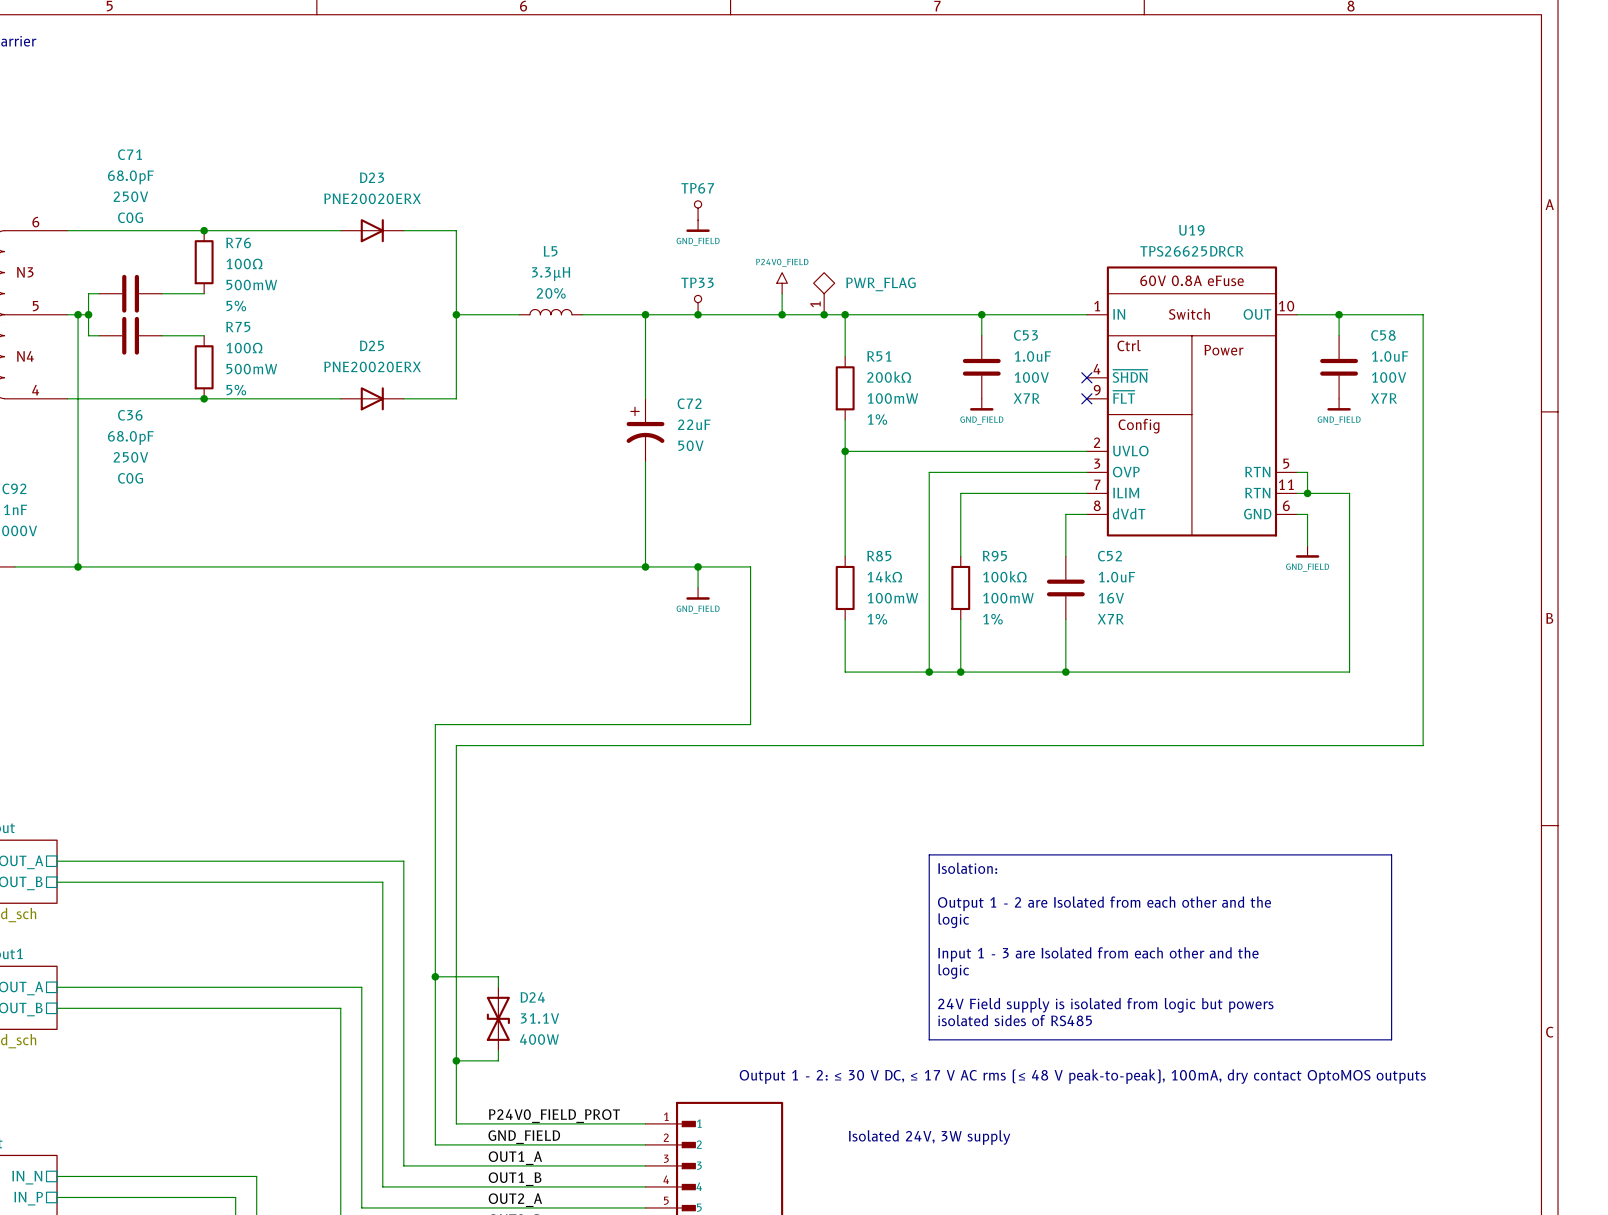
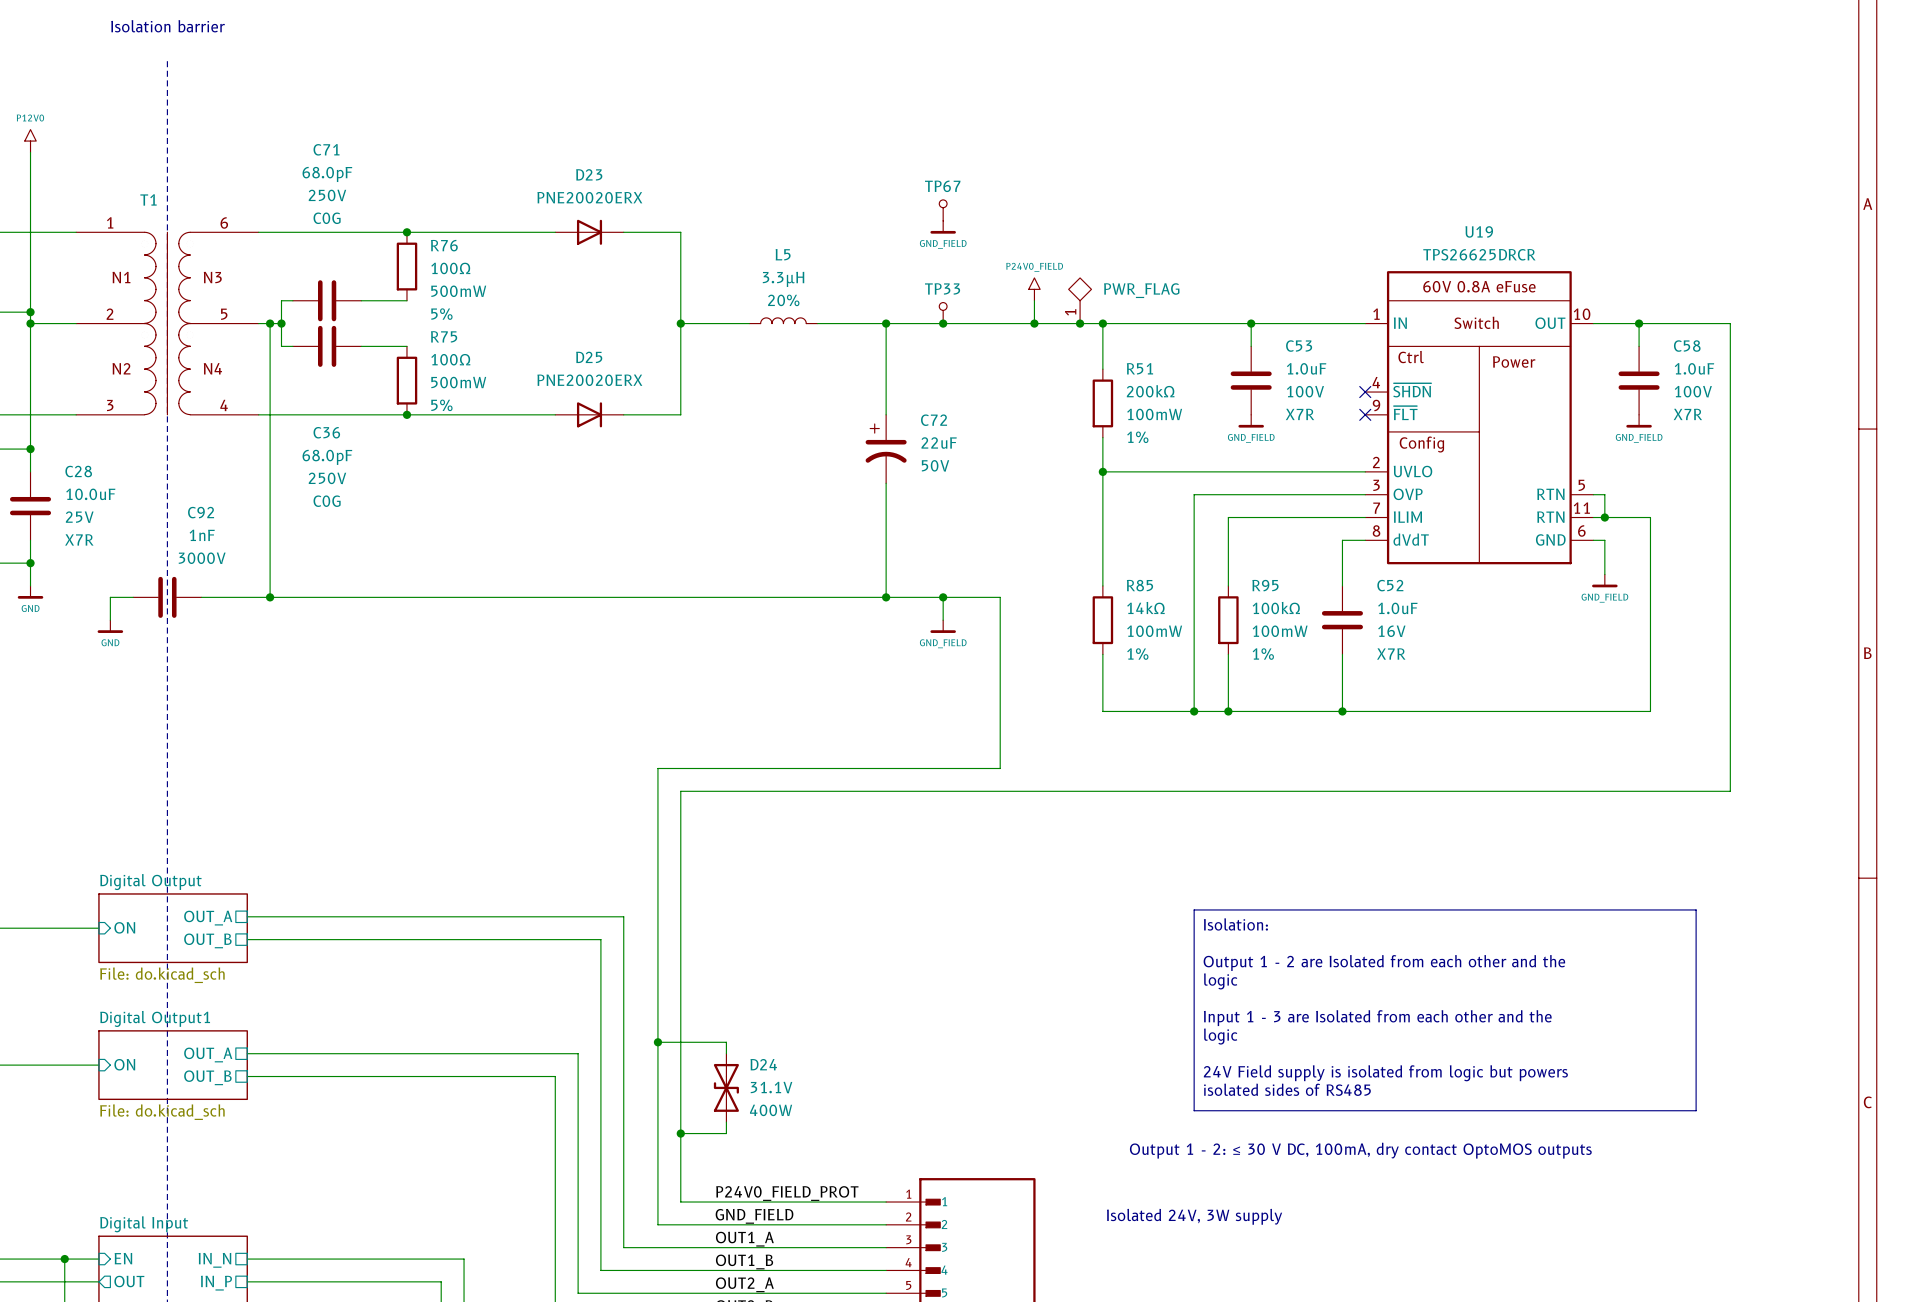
text: Output 1 - 2: ≤ 30 V DC, ≤ 17 V AC rms (≤ 48 V peak-to-peak), 100mA, dry contact OptoMOS outputs (1082, 1076) -> Output 1 - 2: ≤ 30 V DC, 100mA, dry contact OptoMOS outputs (1360, 1150)

